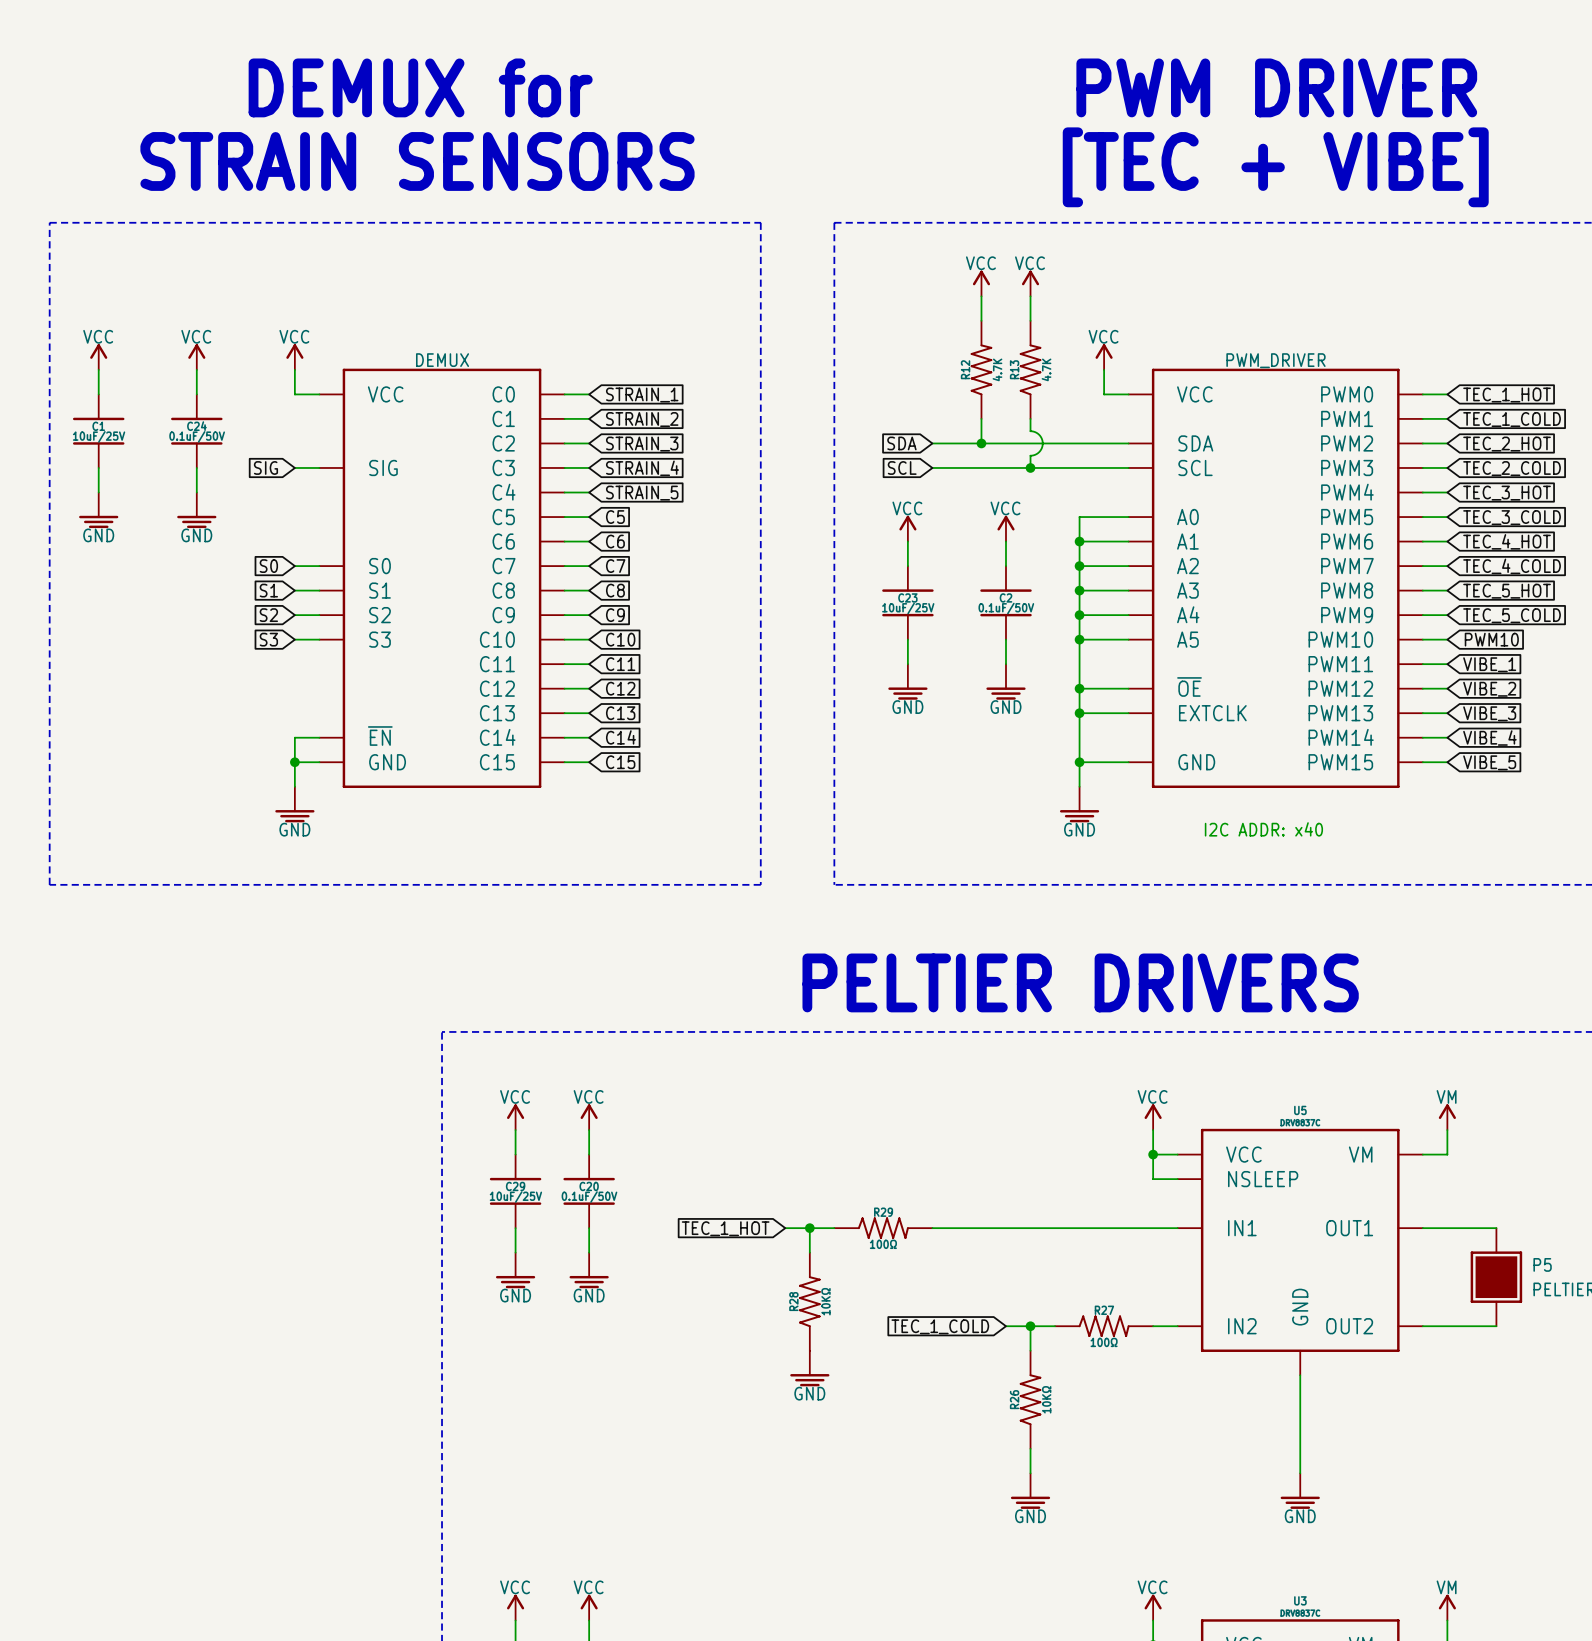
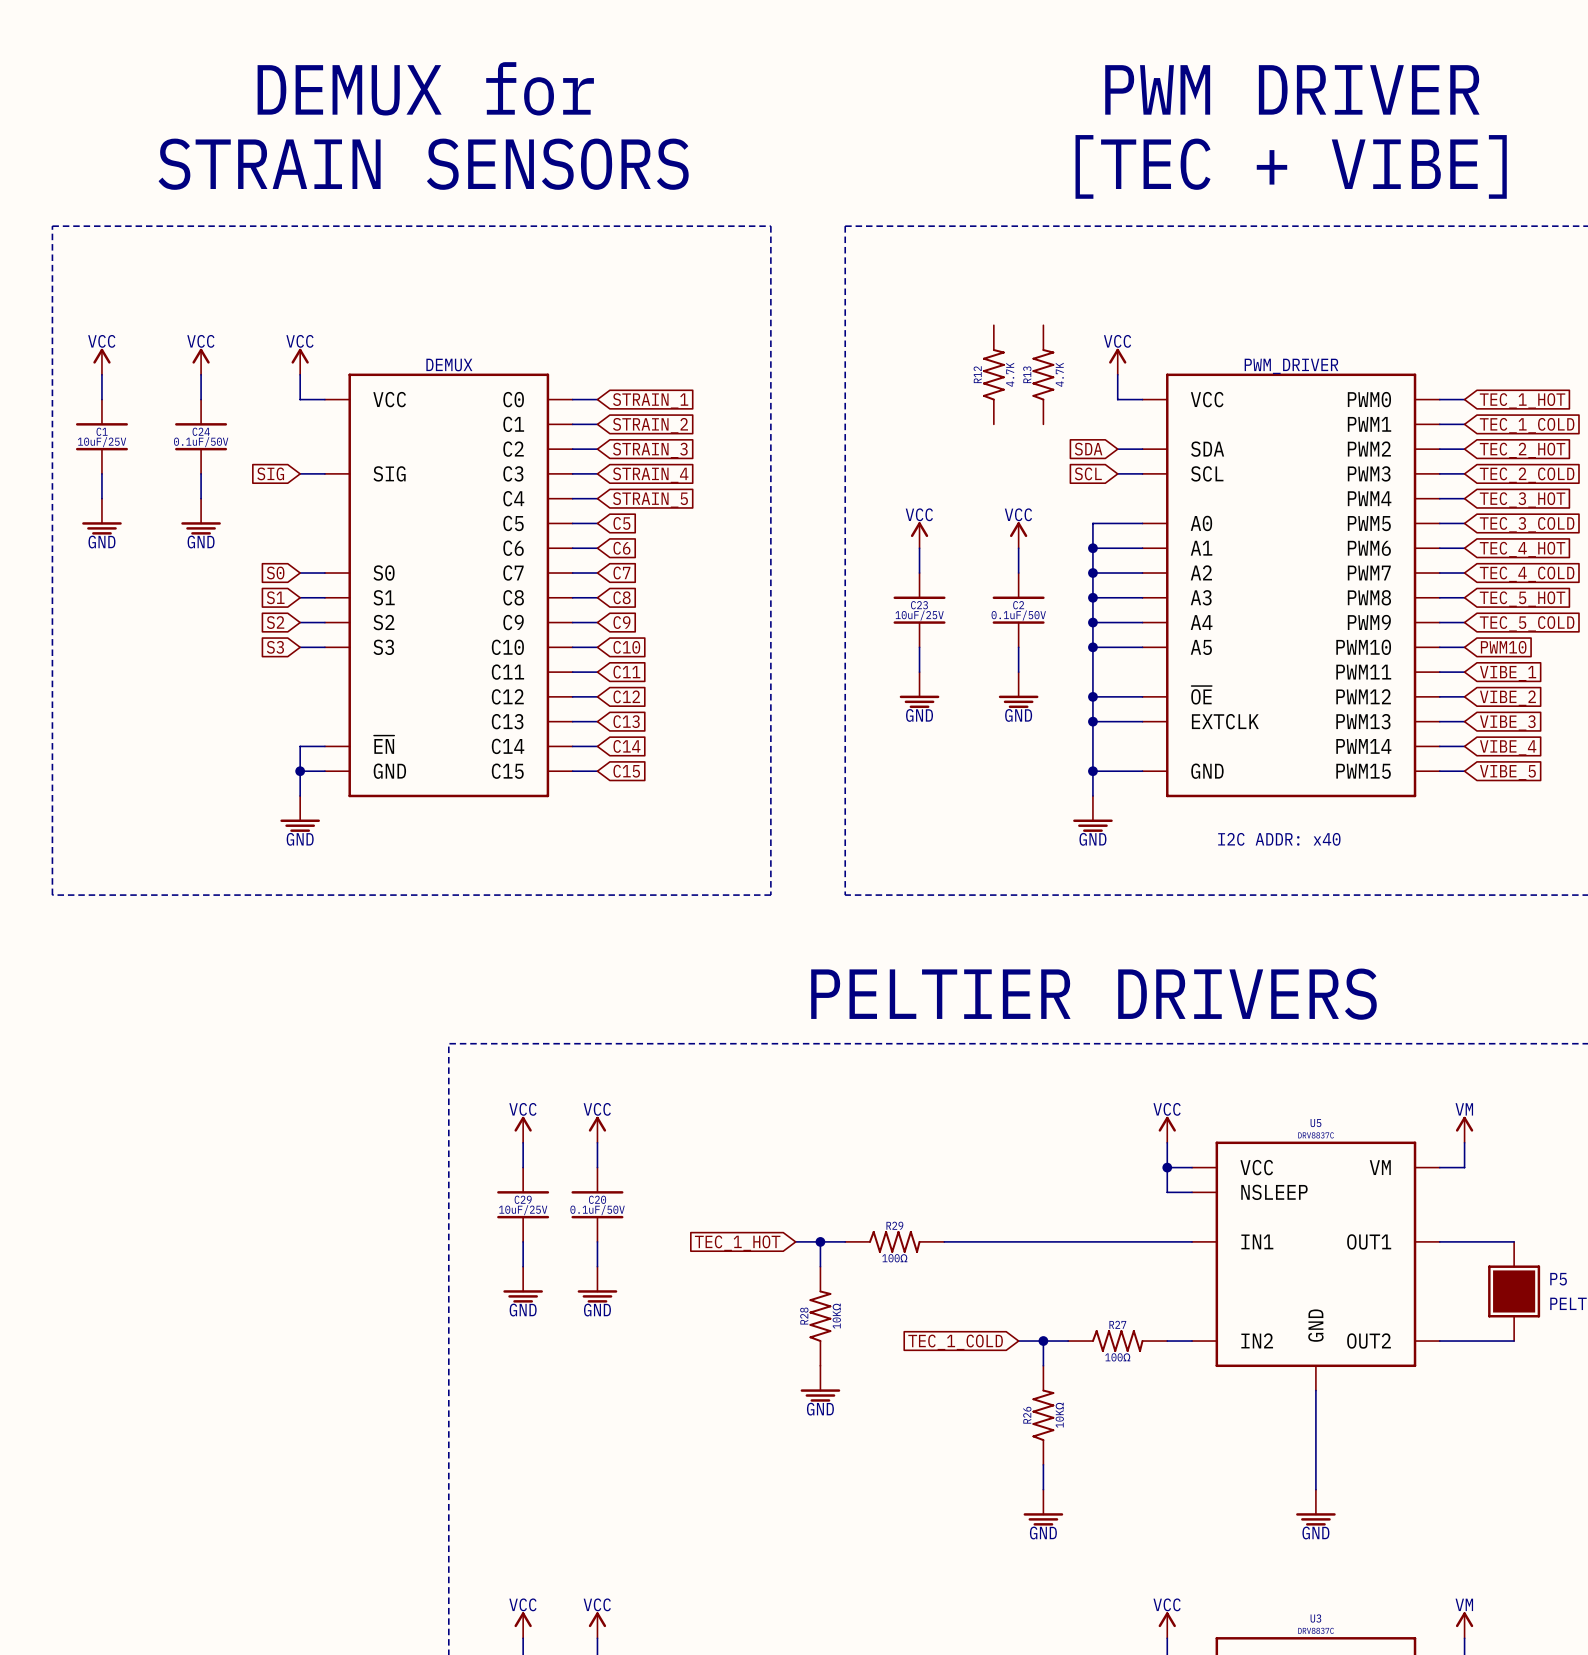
power symbol: (981, 283) -> none
power symbol: (1030, 283) -> none
wire: (981, 296) (981, 320) -> none
wire: (1030, 296) (1030, 320) -> none
wire: (981, 418) (981, 443) -> none
wire: (1030, 418) (1030, 431) (1039, 434) (1042, 443) (1039, 452) (1030, 455) (1030, 467) -> none
global label position: SDA (901, 443) -> SDA (1088, 449)
wire: (932, 443) (1104, 443) -> none
junction: (981, 443) -> none
global label position: SCL (902, 467) -> SCL (1088, 473)
wire: (932, 467) (1104, 467) -> none
junction: (1030, 467) -> none

